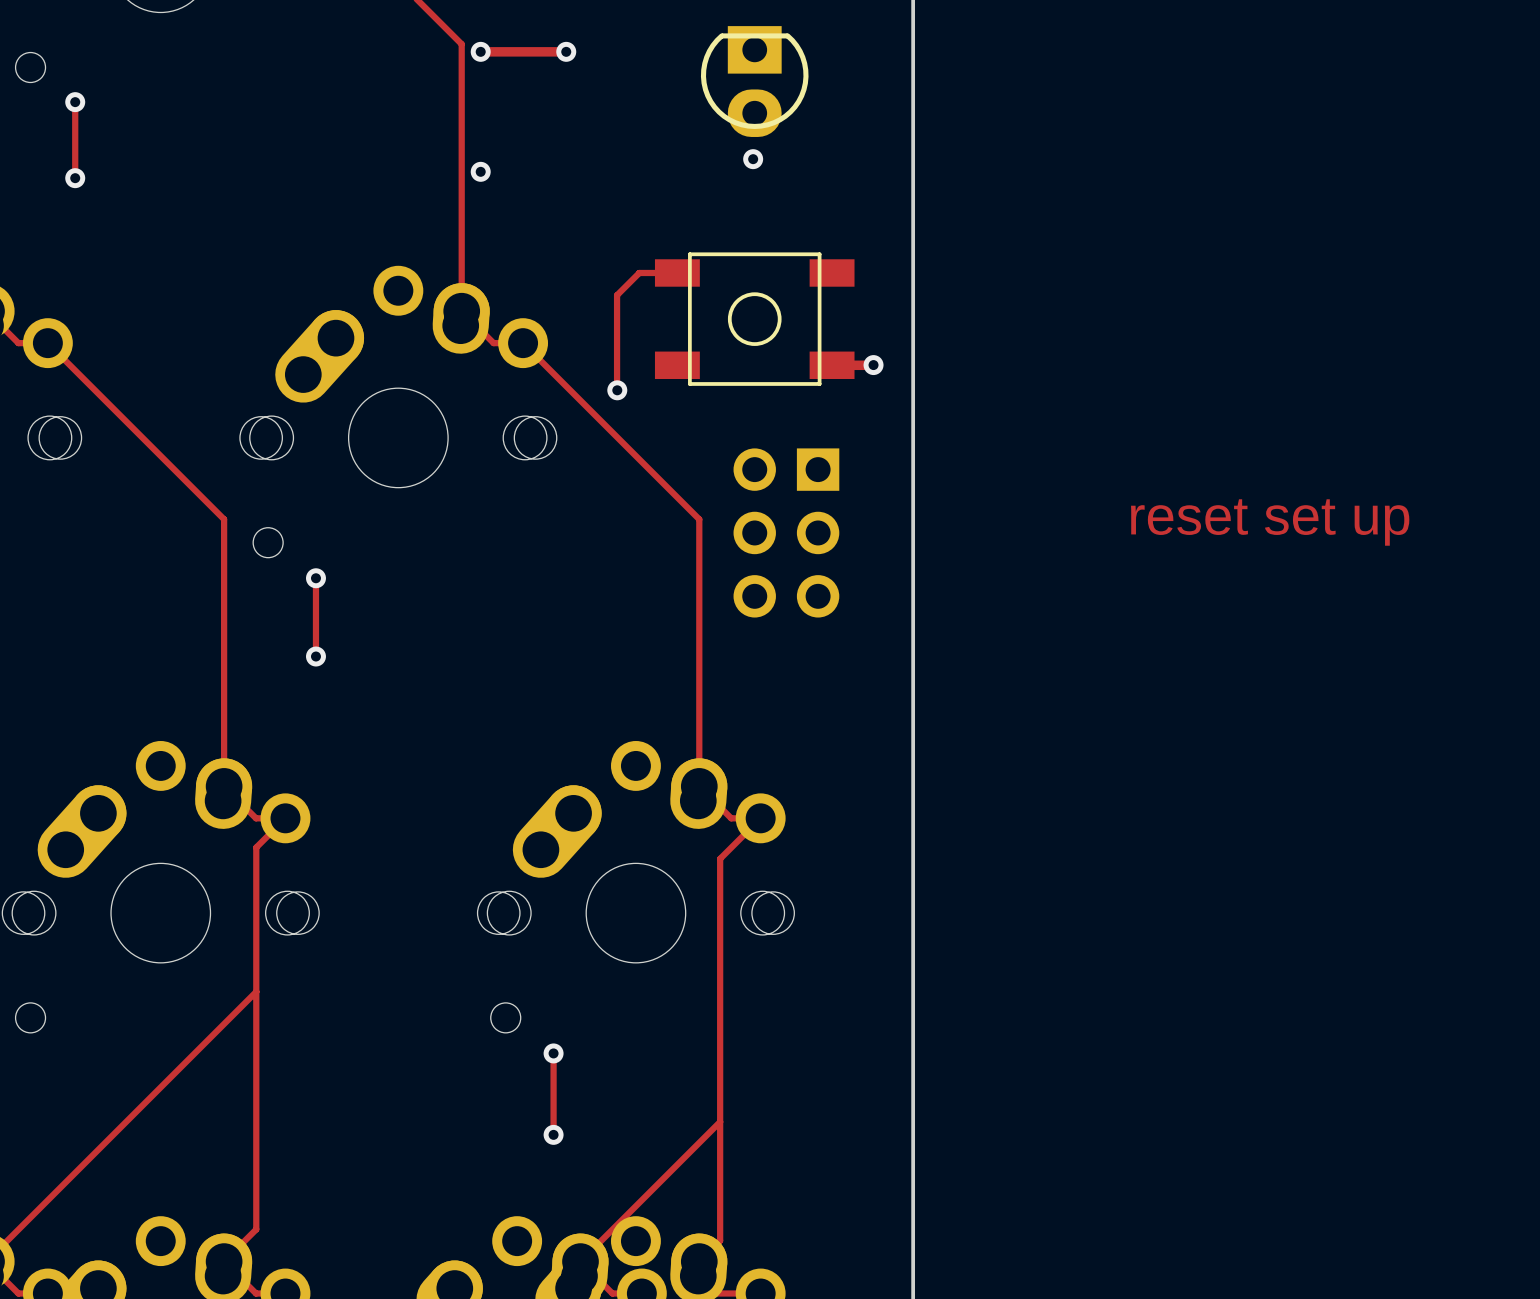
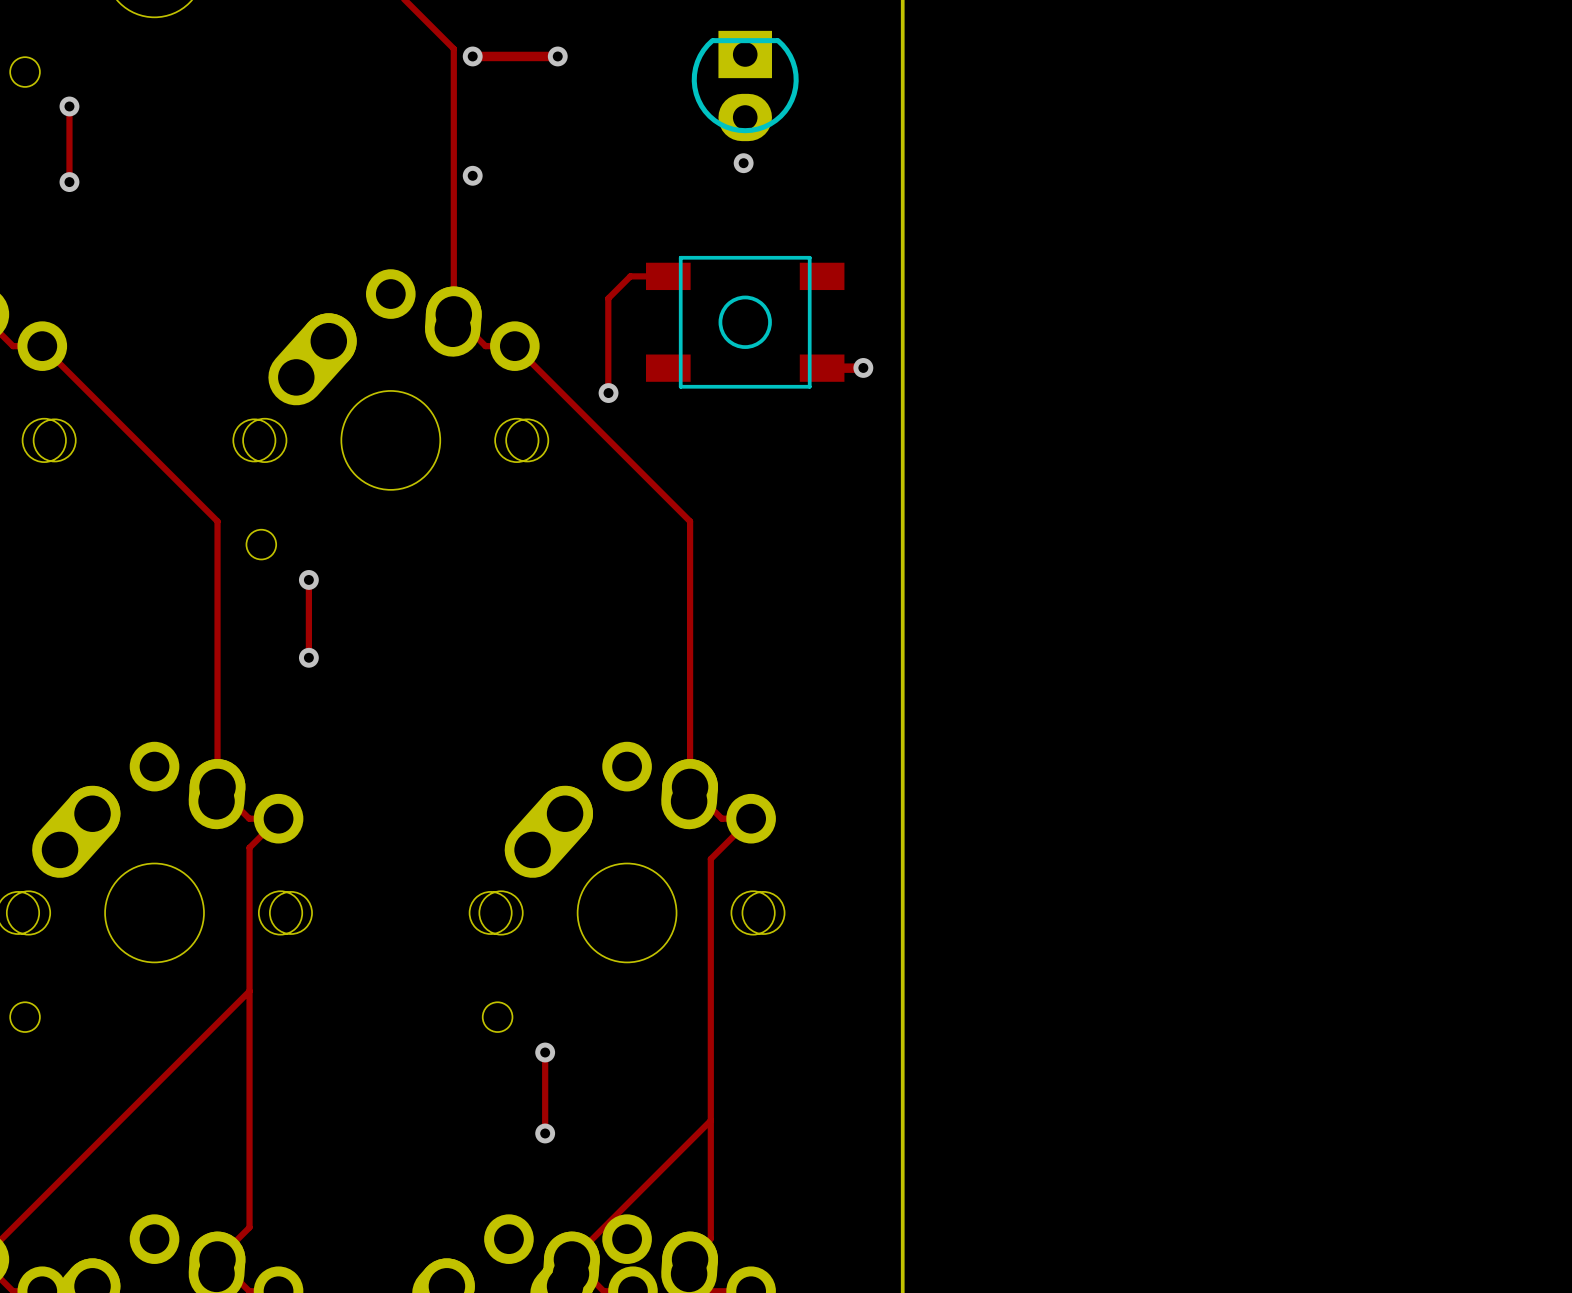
text: reset set up (1270, 522) -> none
part: (786, 532) -> none

